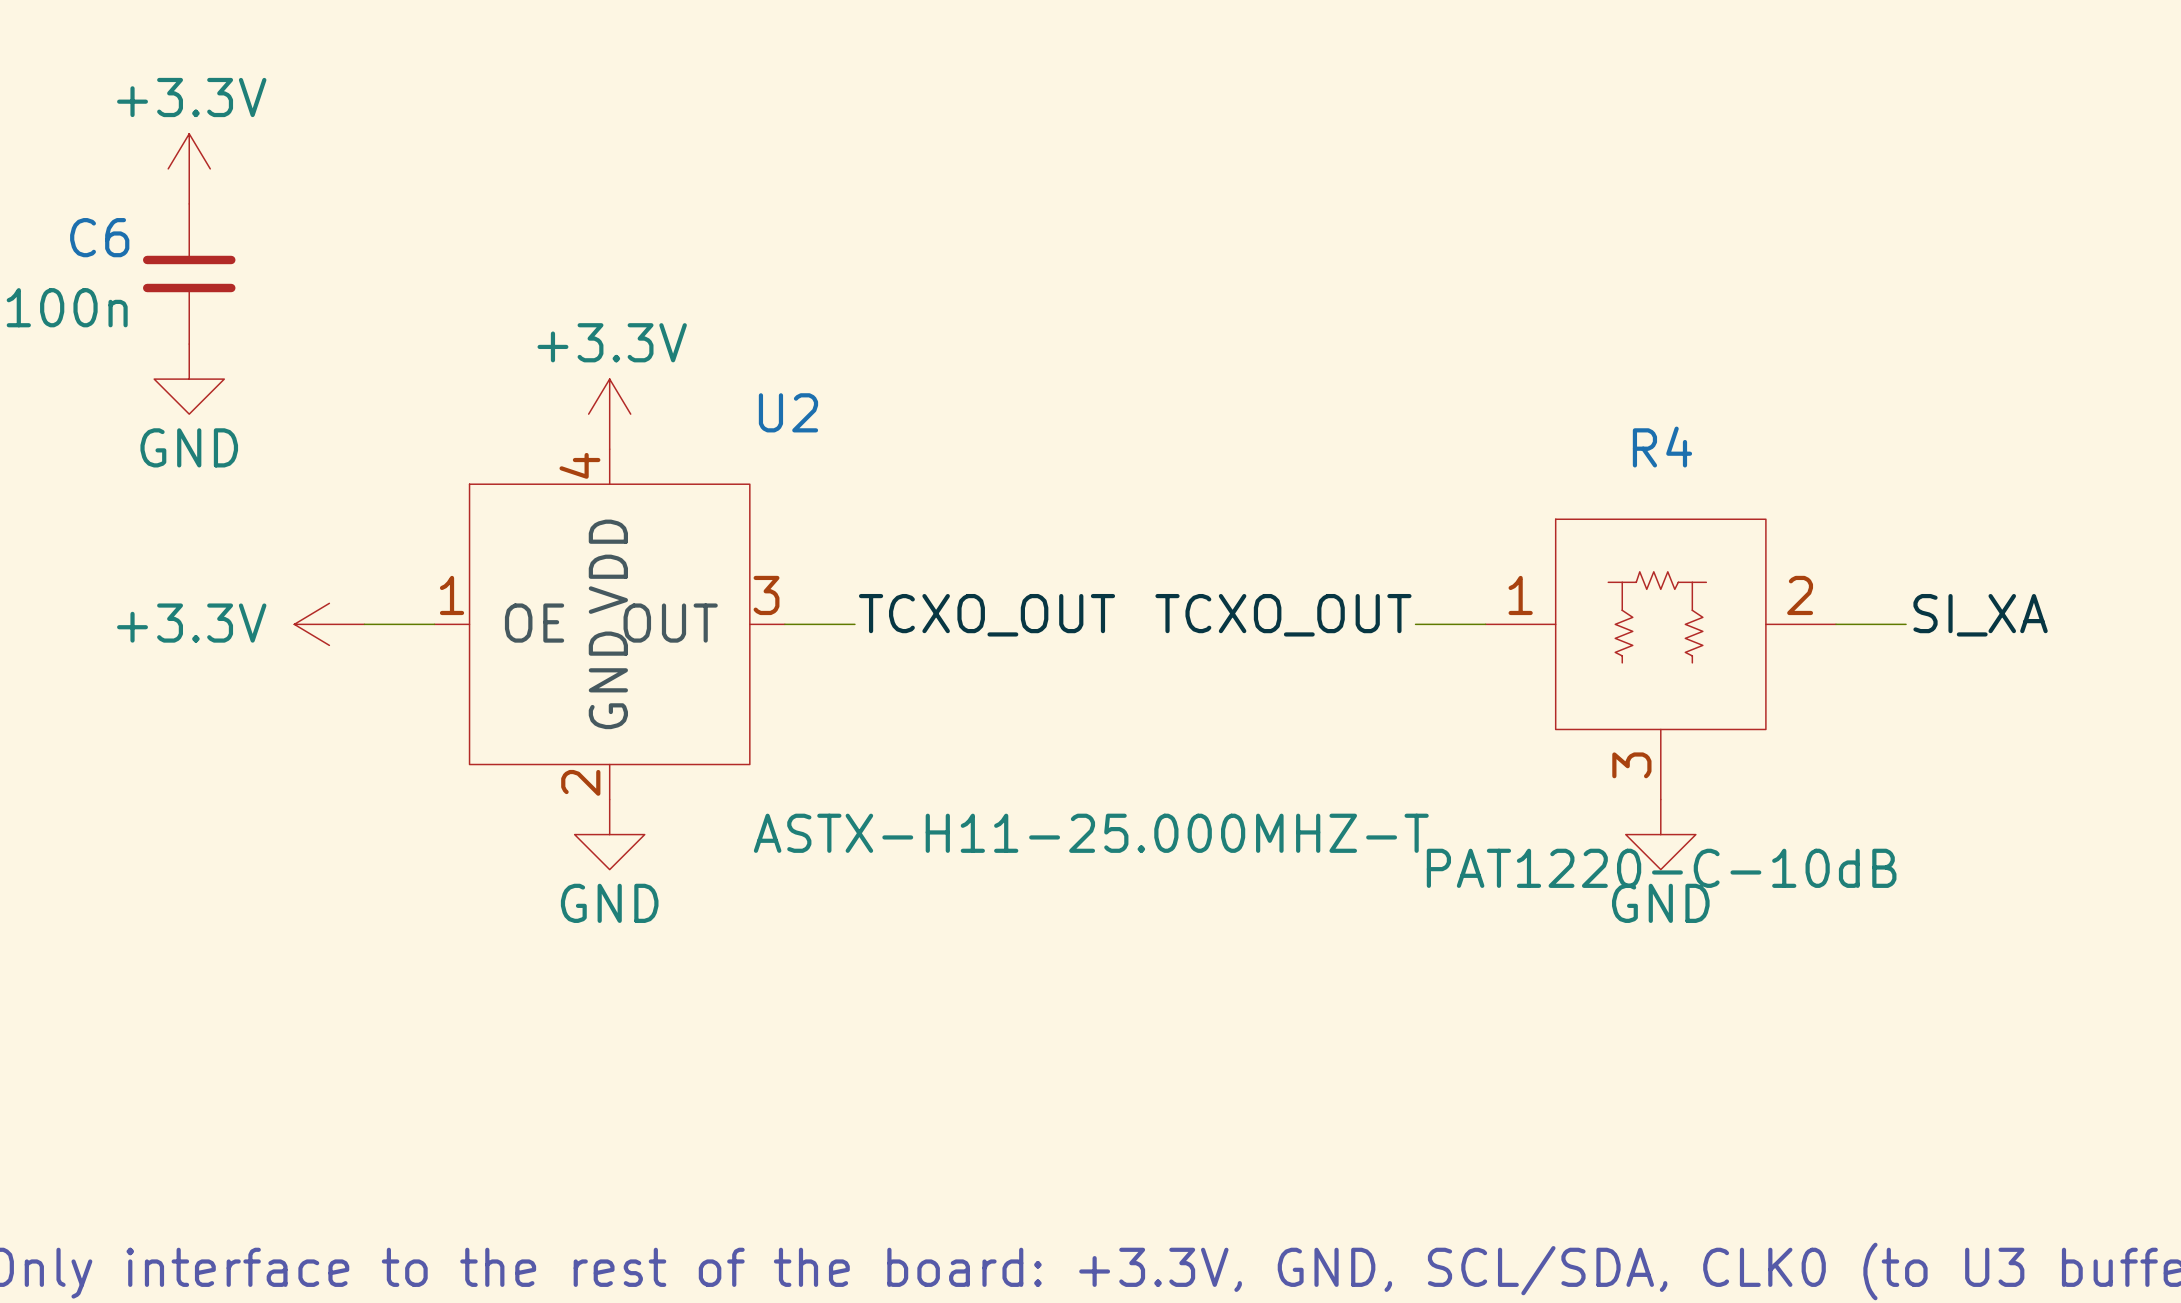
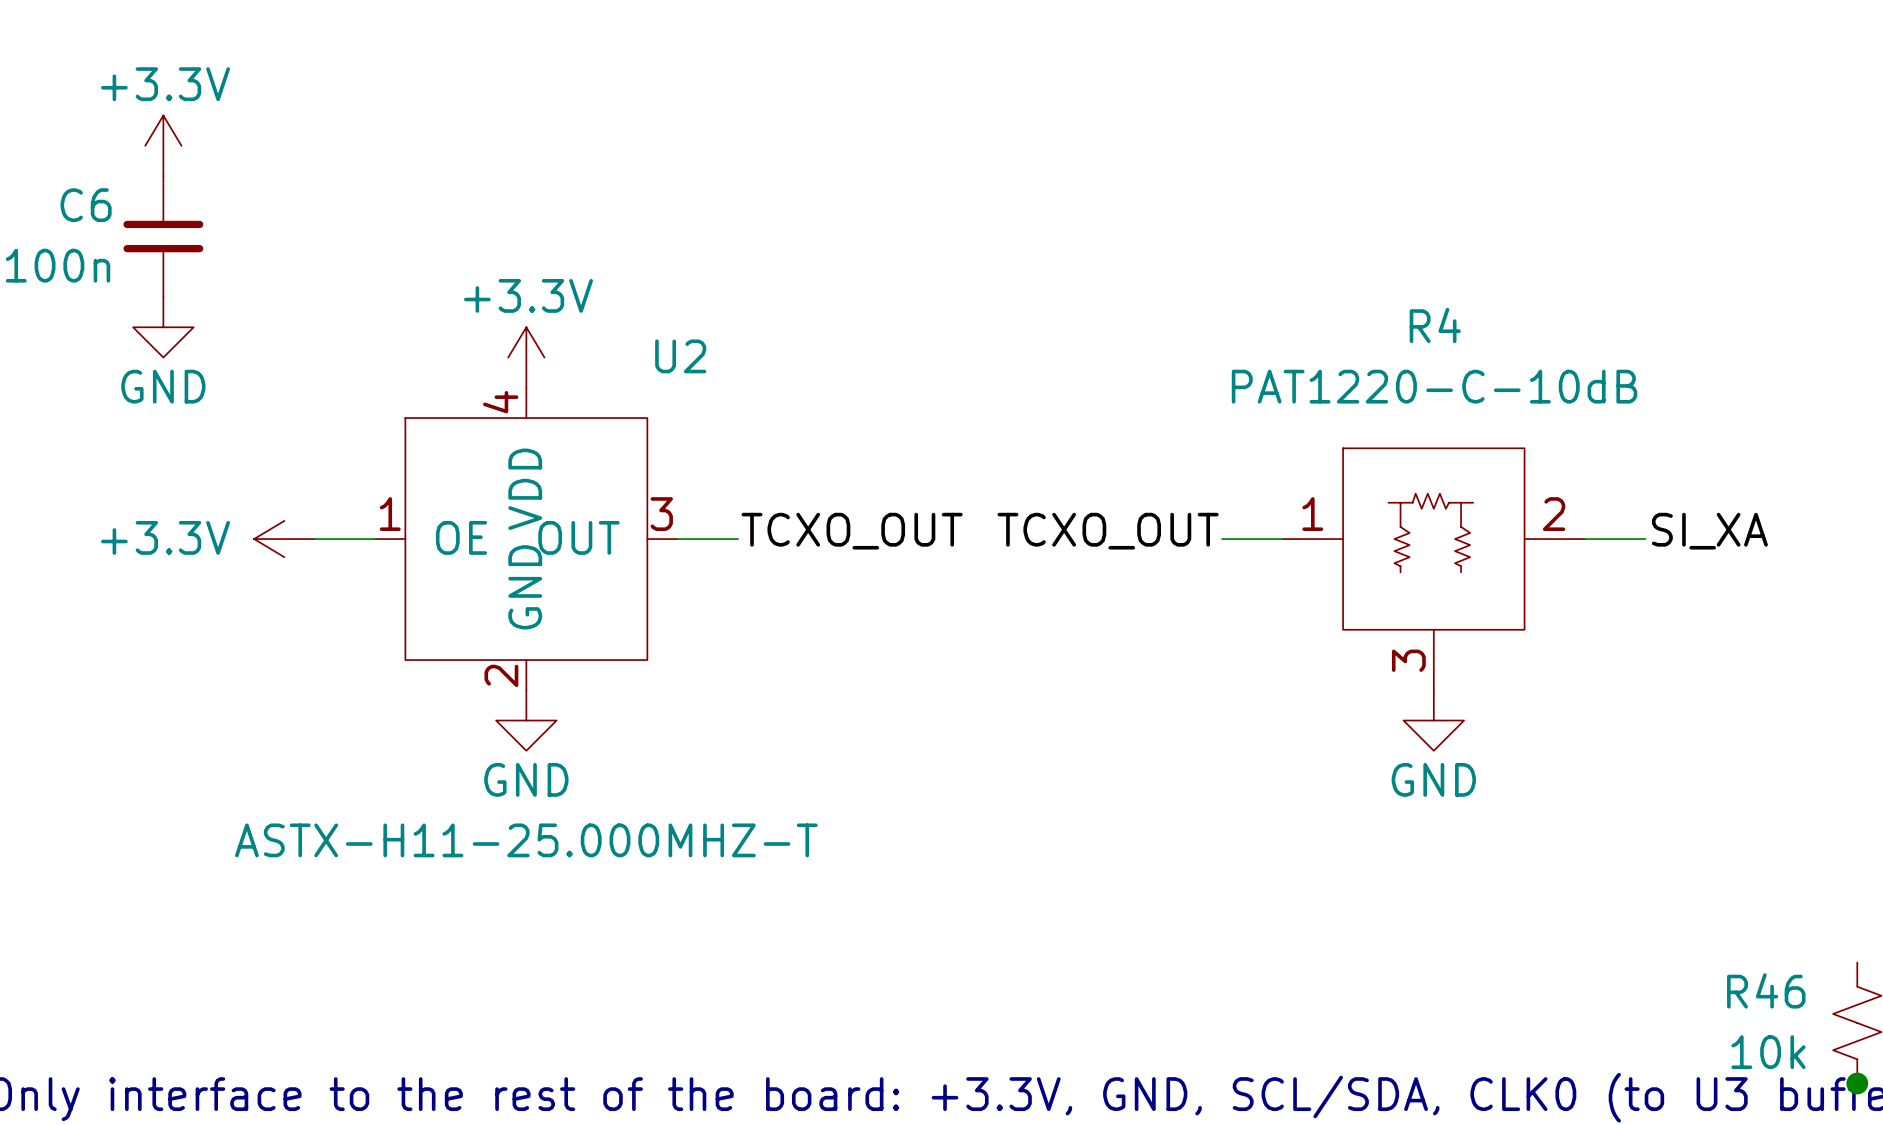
R4 name position: R4 (1662, 447) -> R4 (1435, 325)
U2 value position: ASTX-H11-25.000MHZ-T (1091, 833) -> ASTX-H11-25.000MHZ-T (526, 840)
R4 value position: PAT1220-C-10dB (1661, 868) -> PAT1220-C-10dB (1434, 386)
R46: none -> 10k (1857, 1023)
junction: none -> (1857, 1083)

